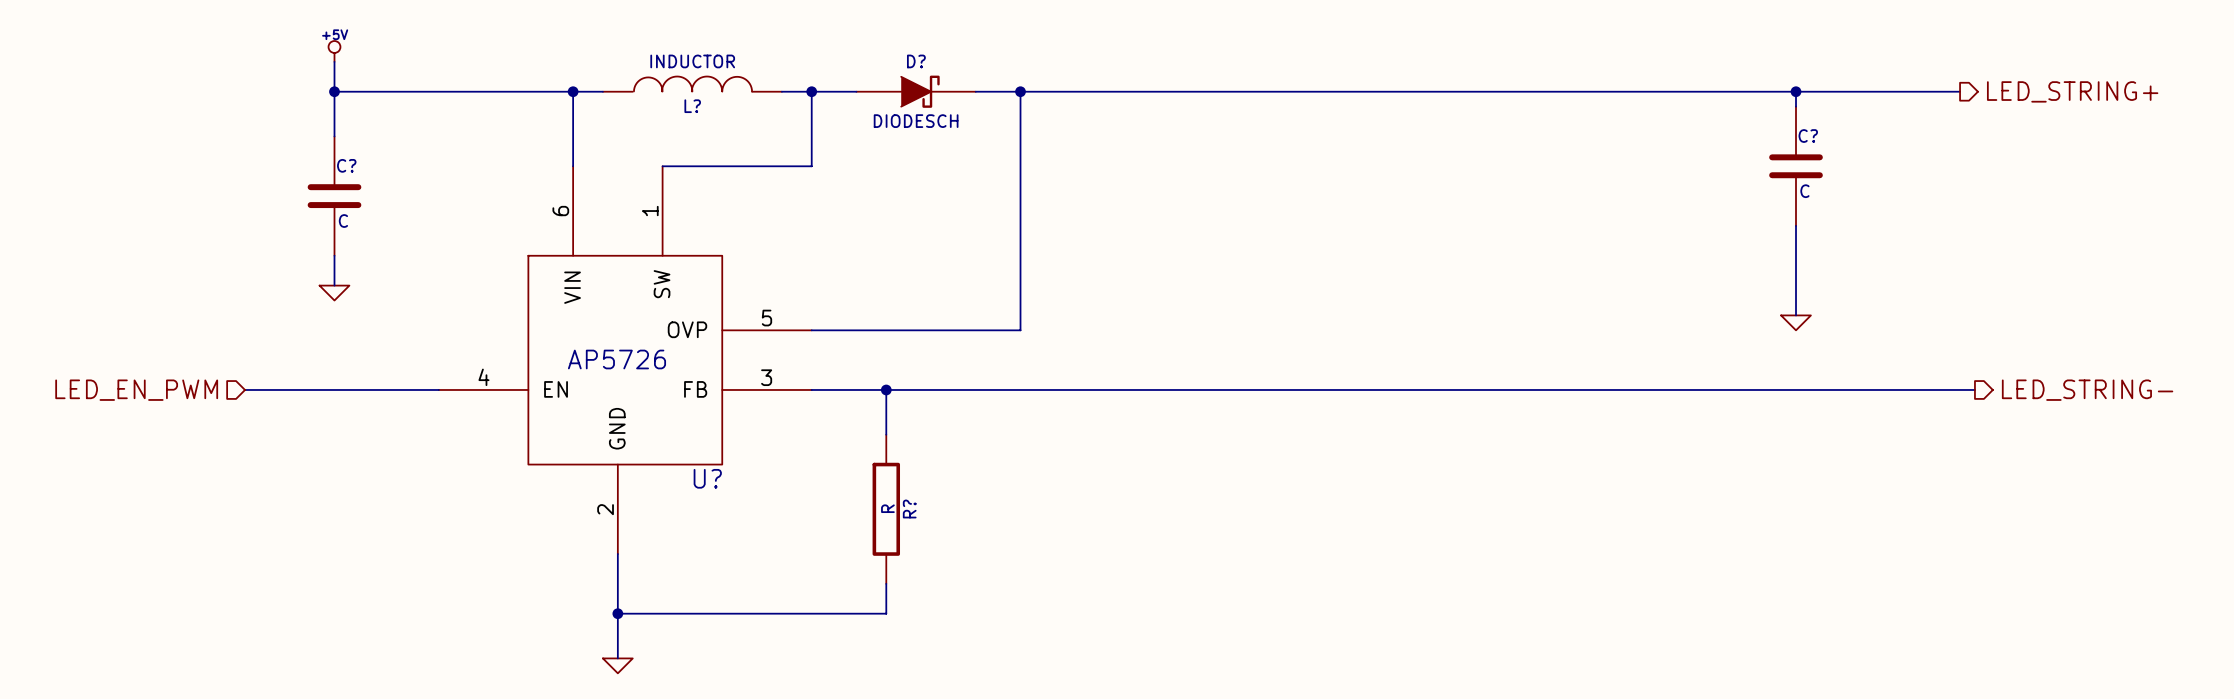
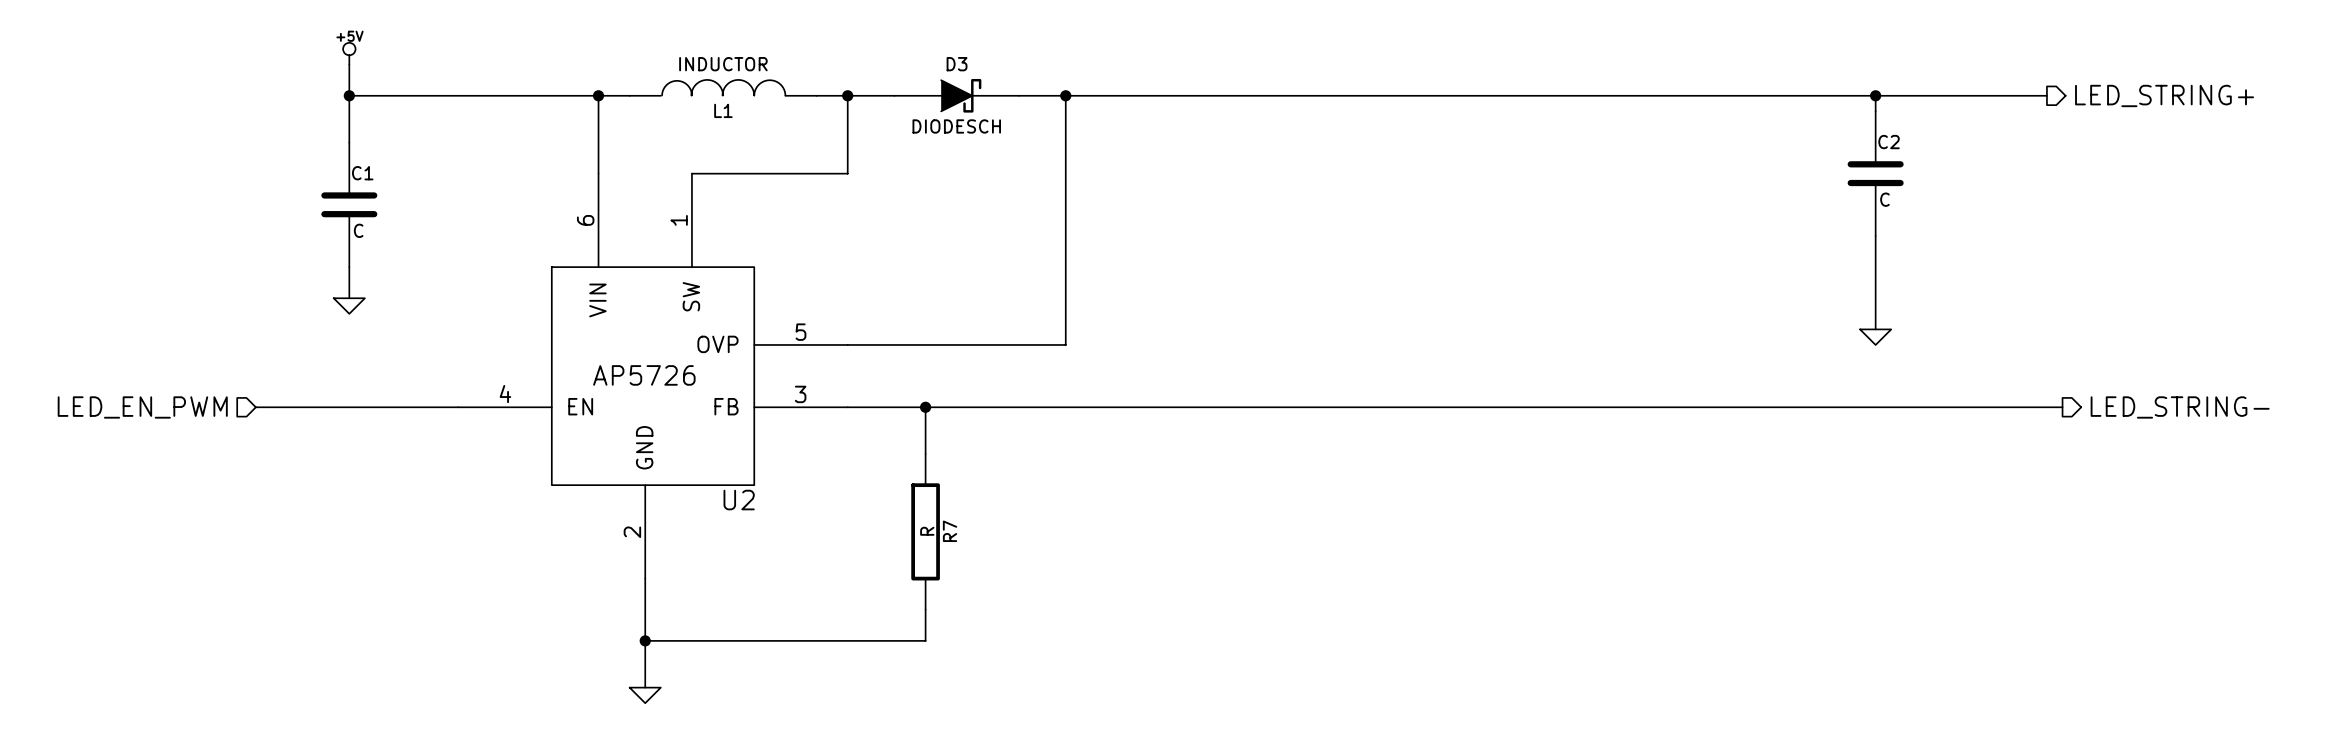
D? name: D? (916, 61) -> D3 (957, 64)
L? name: L? (692, 106) -> L1 (723, 110)
C? name: C? (1808, 136) -> C2 (1889, 142)
C? name: C? (346, 165) -> C1 (362, 173)
U? name: U? (707, 478) -> U2 (739, 500)
R? name: R? (909, 509) -> R7 (950, 531)

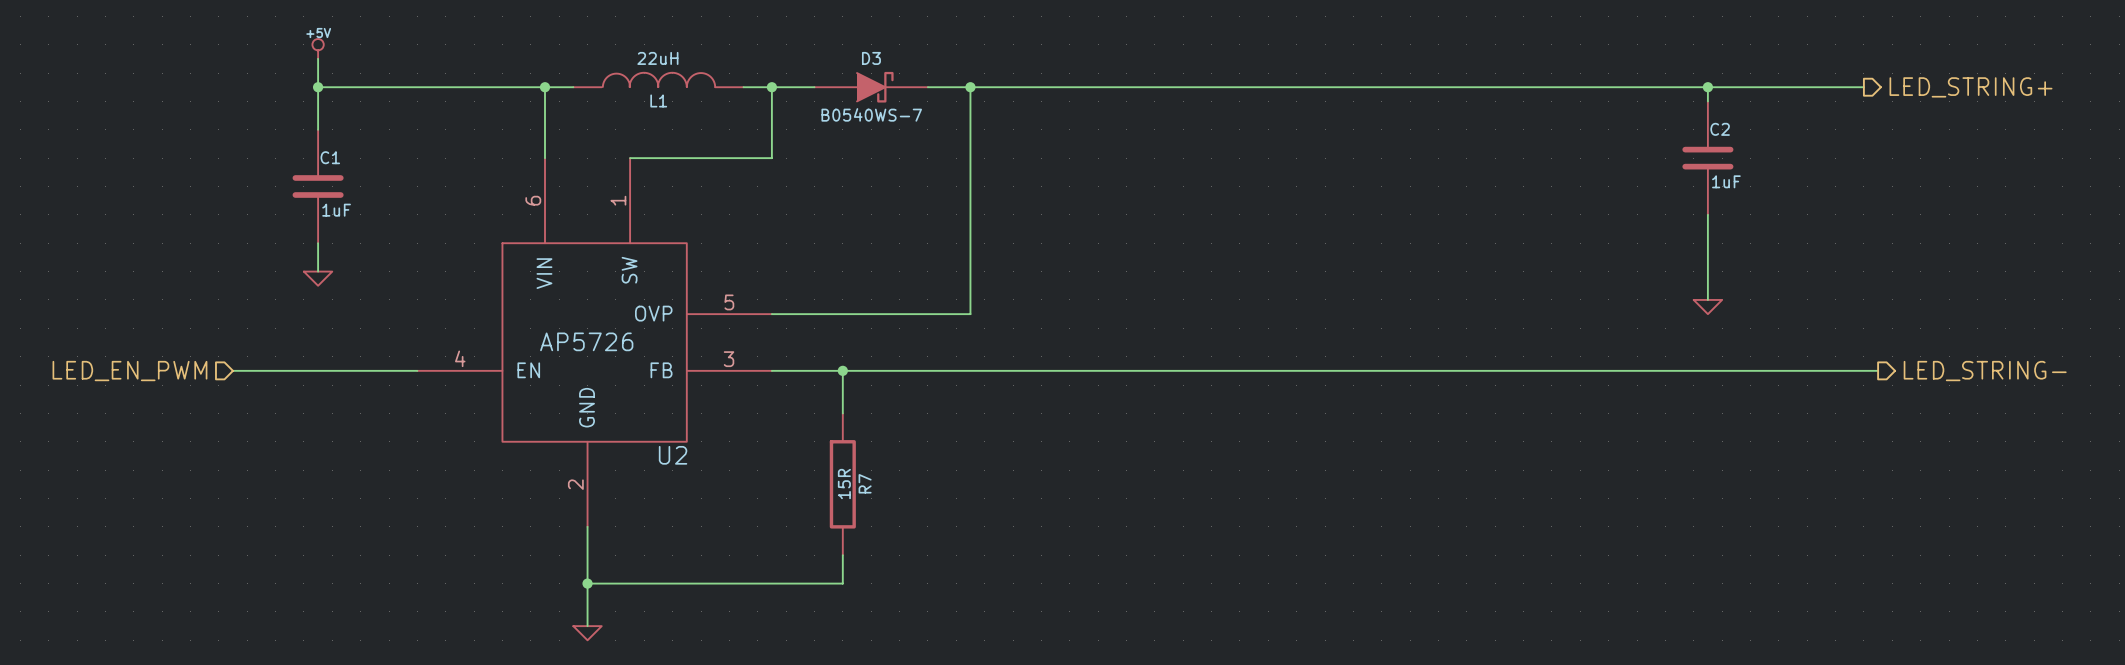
L1 value: INDUCTOR (723, 64) -> 22uH (657, 58)
D3 value: DIODESCH (956, 126) -> B0540WS-7 (871, 114)
C2 value: C (1884, 199) -> 1uF (1726, 181)
C1 value: C (358, 230) -> 1uF (336, 210)
R7 value: R (927, 531) -> 15R (844, 484)

